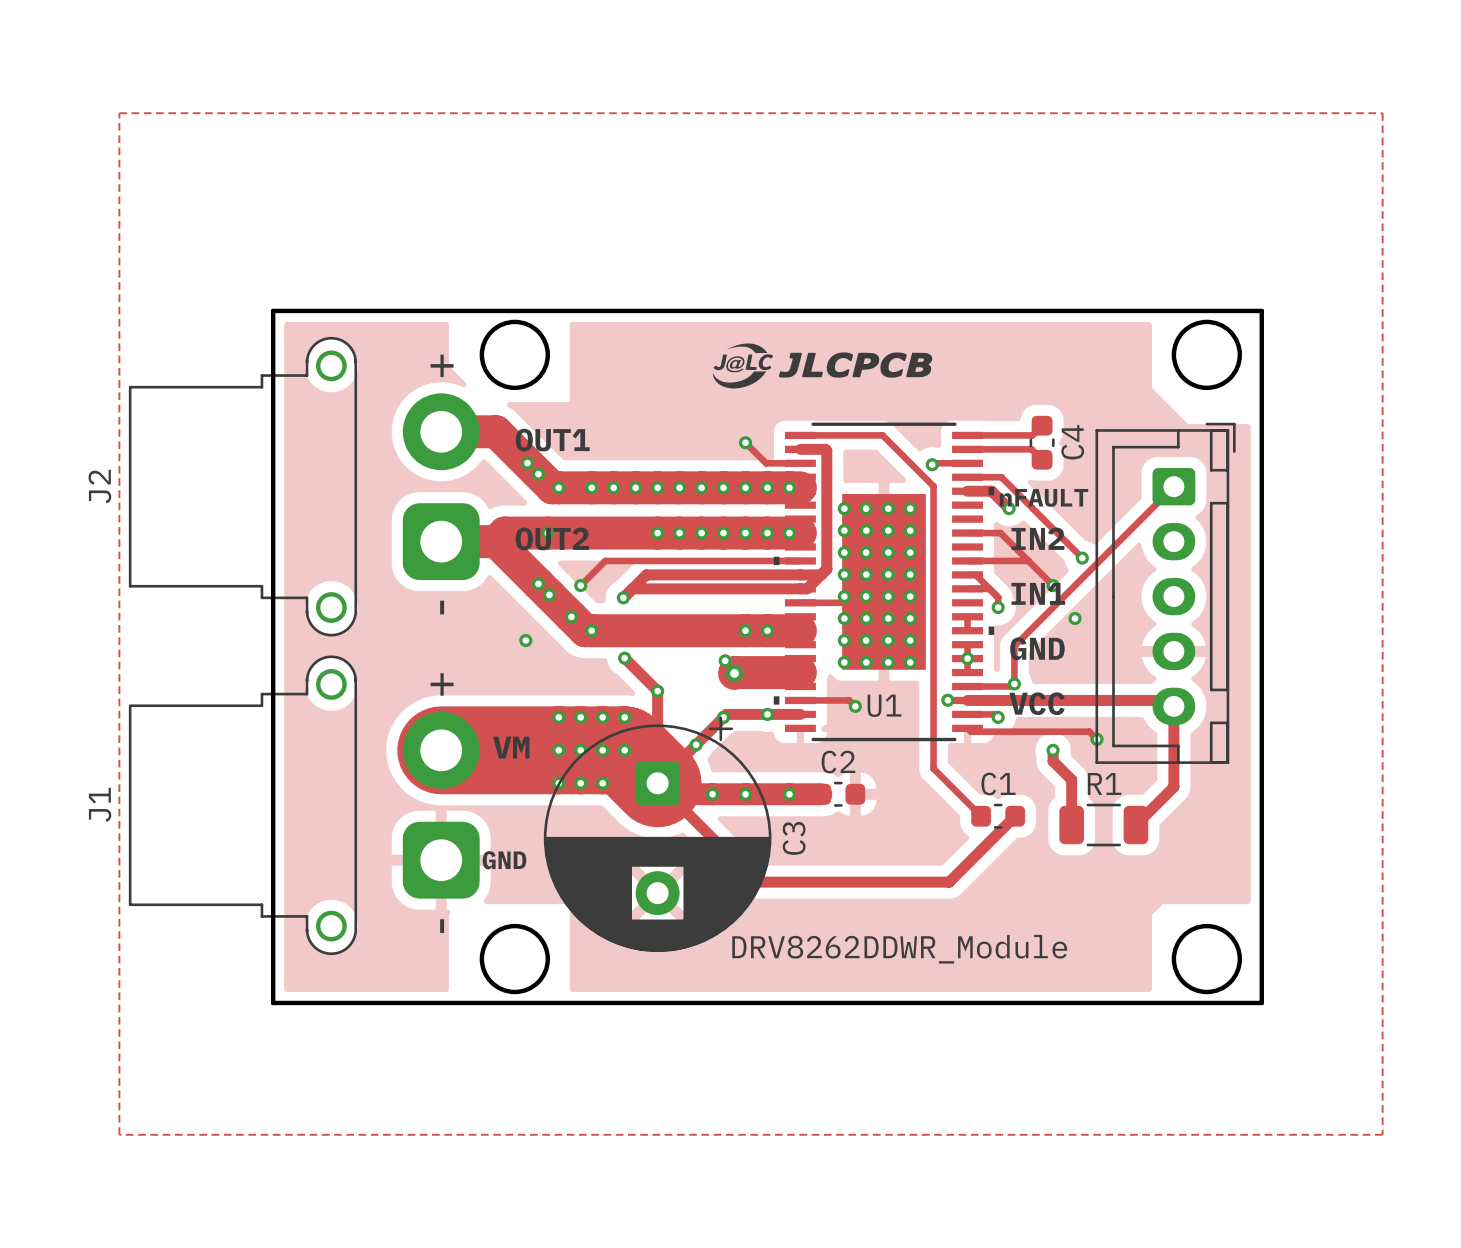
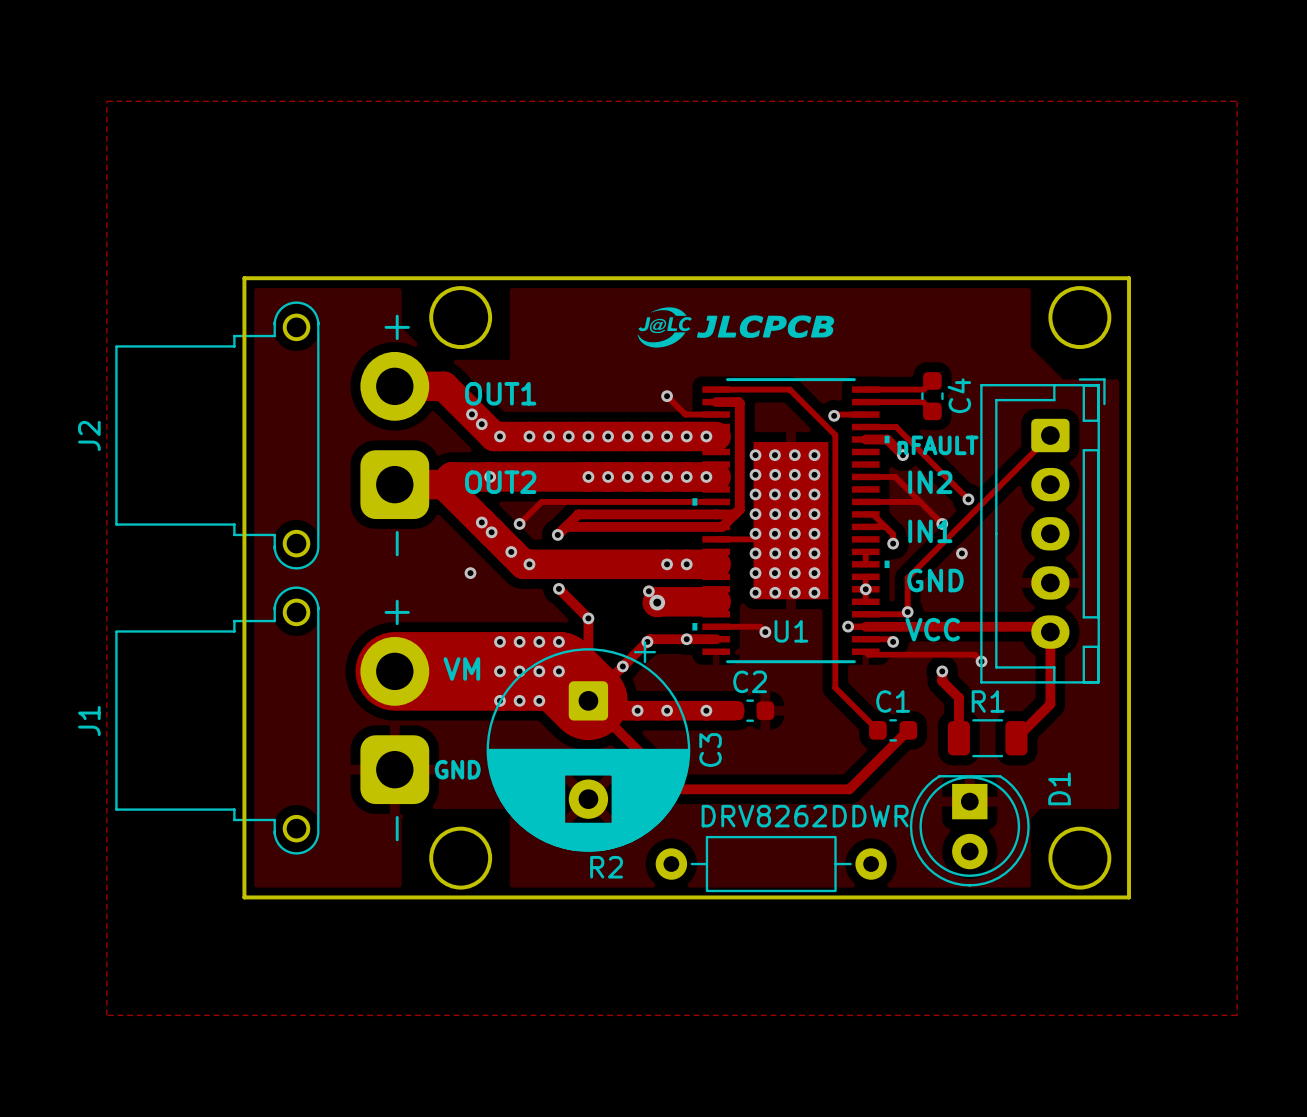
D1: none -> (969, 830)
U1 value: DRV8262DDWR_Module (899, 949) -> DRV8262DDWR (805, 816)
R2: none -> (771, 864)

